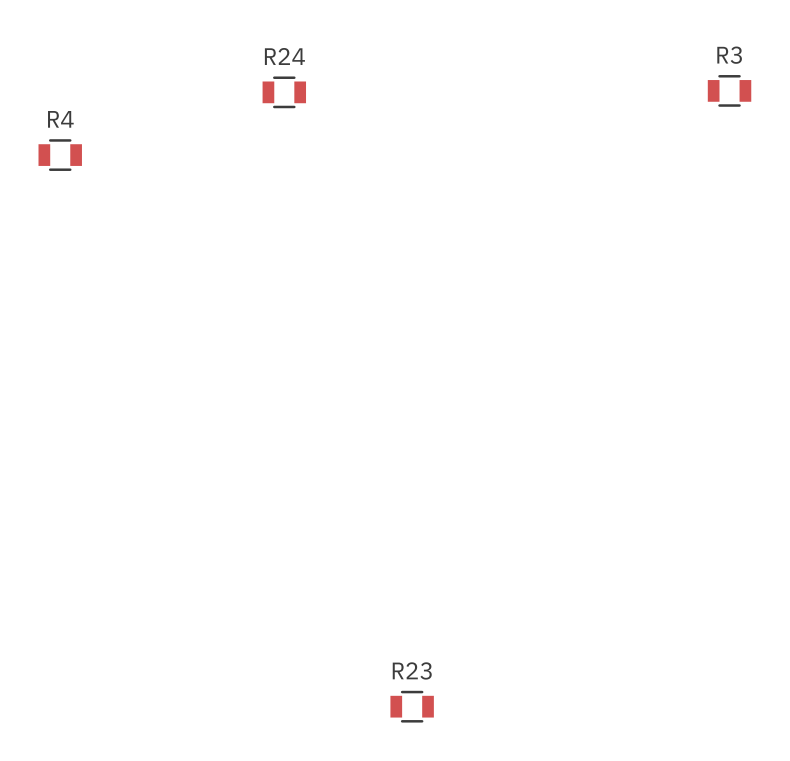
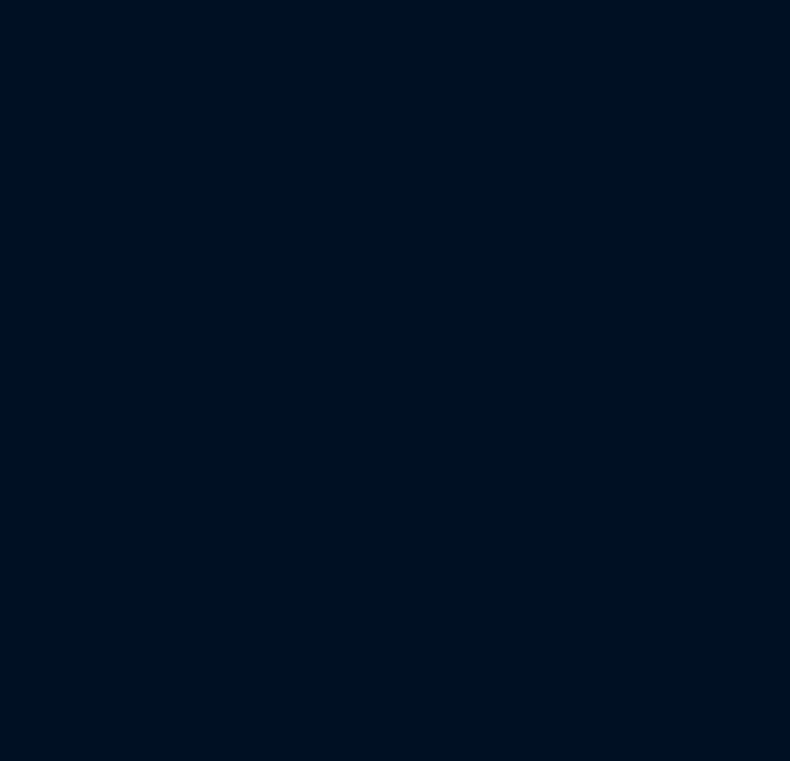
R3: (729, 90) -> none
R24: (284, 92) -> none
R4: (60, 155) -> none
R23: (412, 706) -> none

